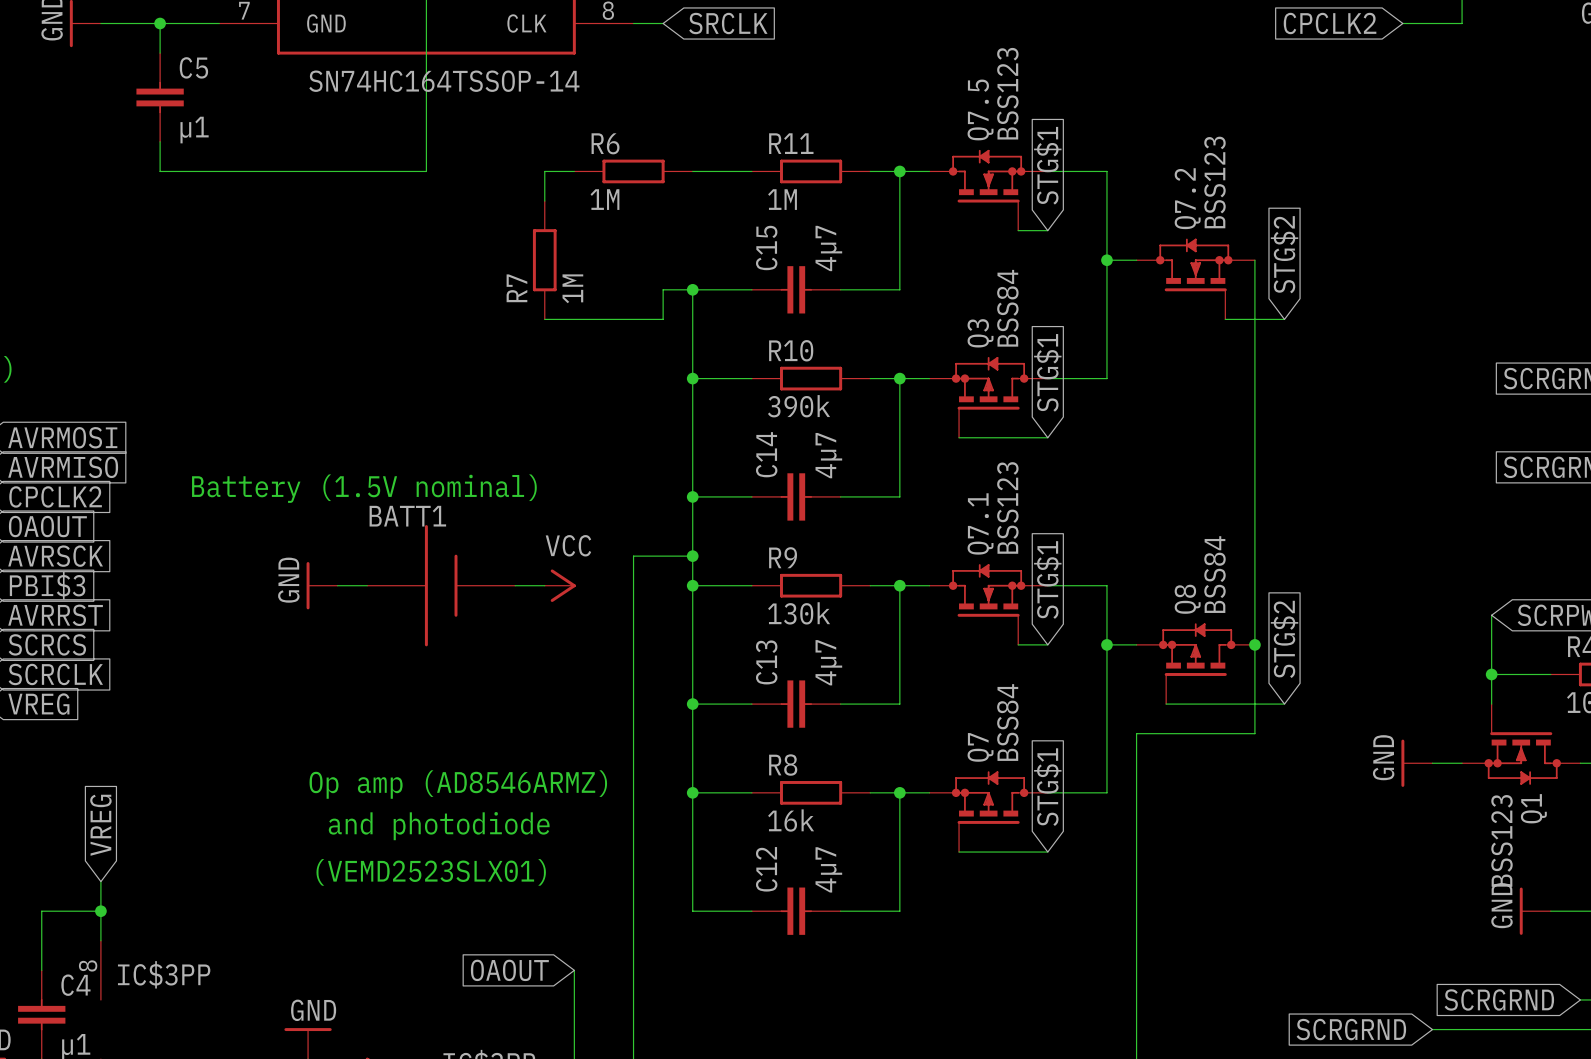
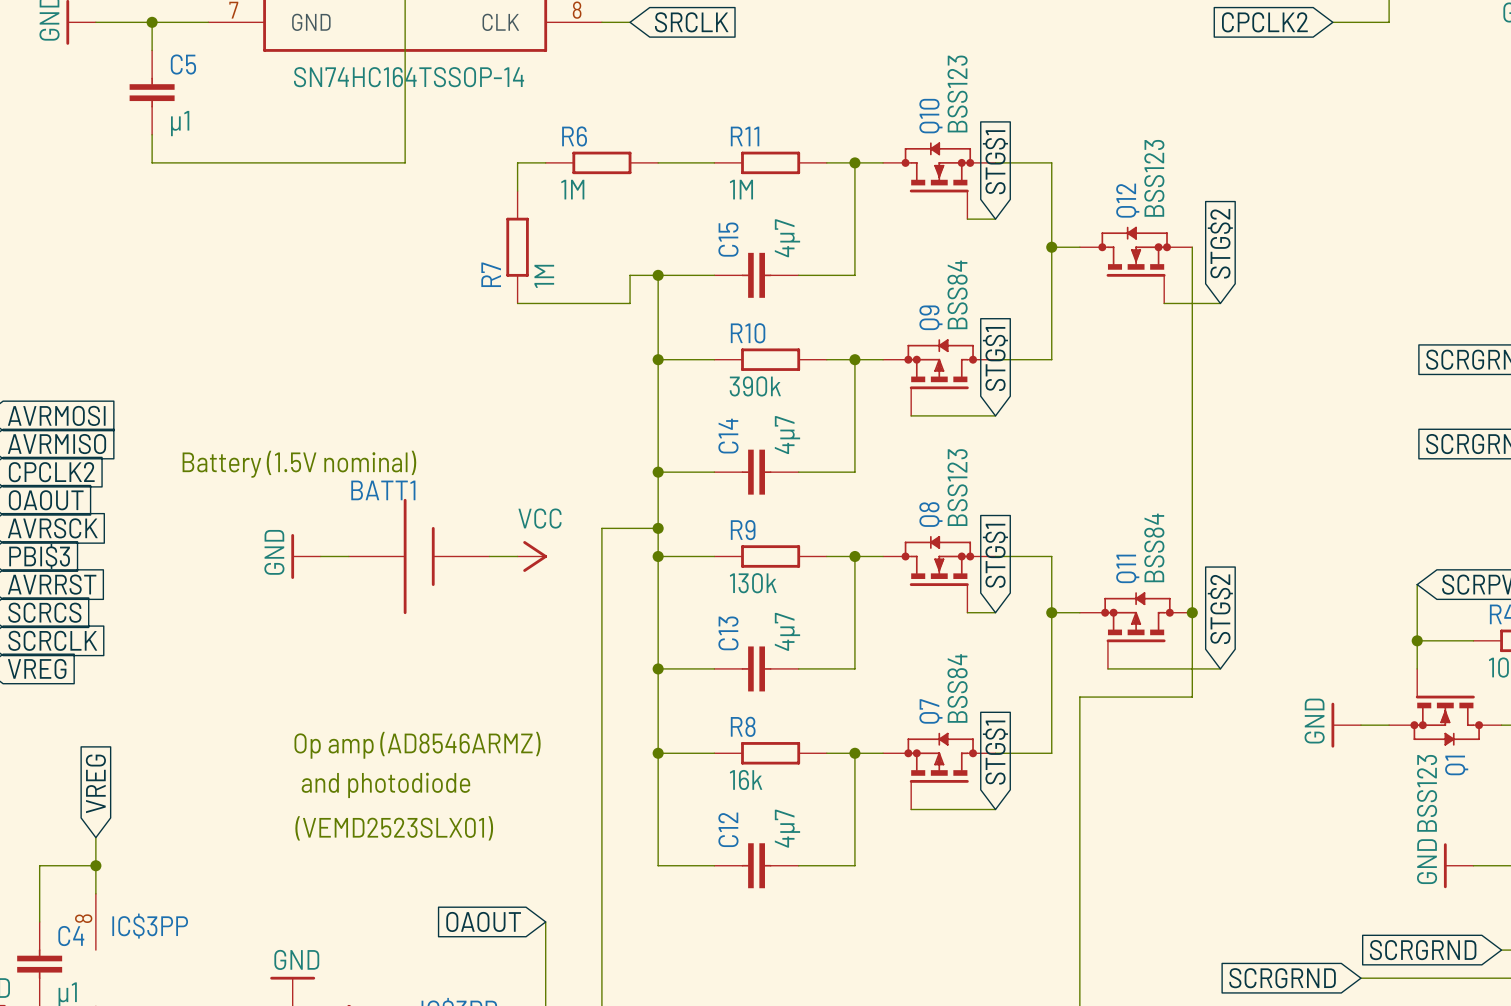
Q7.5 name: Q7.5 (980, 109) -> Q10 (930, 116)
Q7.2 name: Q7.2 (1187, 198) -> Q12 (1127, 200)
Q3 name: Q3 (980, 333) -> Q9 (930, 317)
Q7.1 name: Q7.1 (980, 523) -> Q8 (930, 514)
Q8 name: Q8 (1187, 599) -> Q11 (1127, 568)

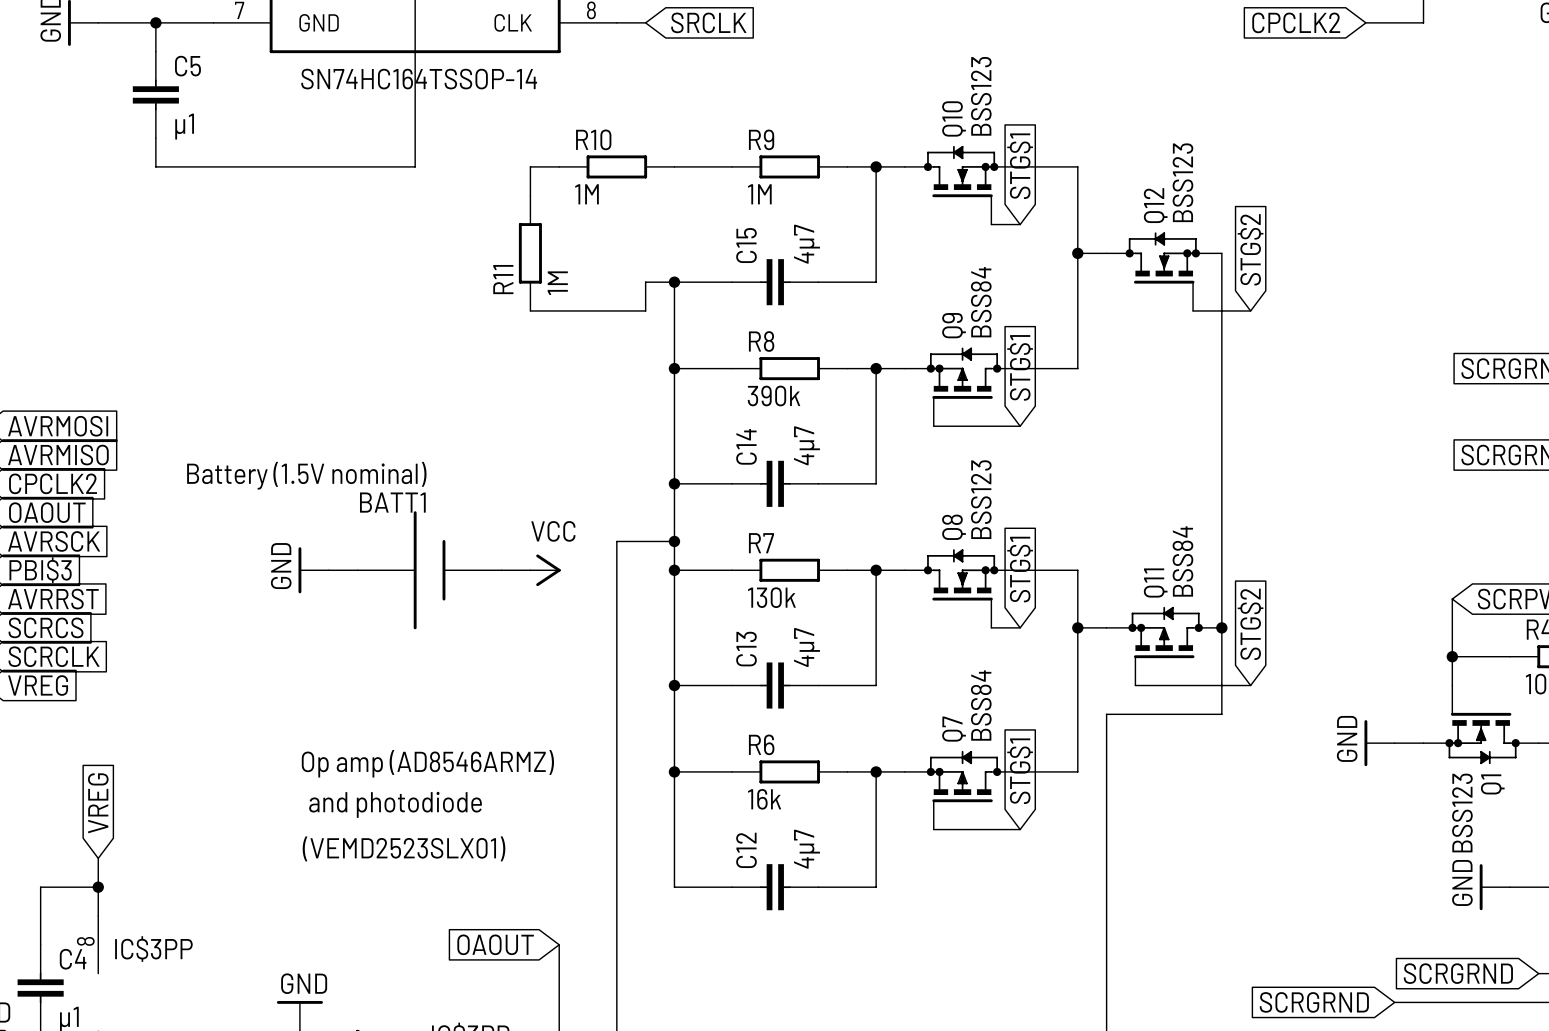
R6 name: R6 (574, 136) -> R10 (593, 139)
R11 name: R11 (745, 136) -> R9 (761, 139)
R7 name: R7 (491, 274) -> R11 (503, 279)
R10 name: R10 (748, 333) -> R8 (761, 341)
R9 name: R9 (743, 530) -> R7 (761, 543)
R8 name: R8 (743, 726) -> R6 (761, 744)

